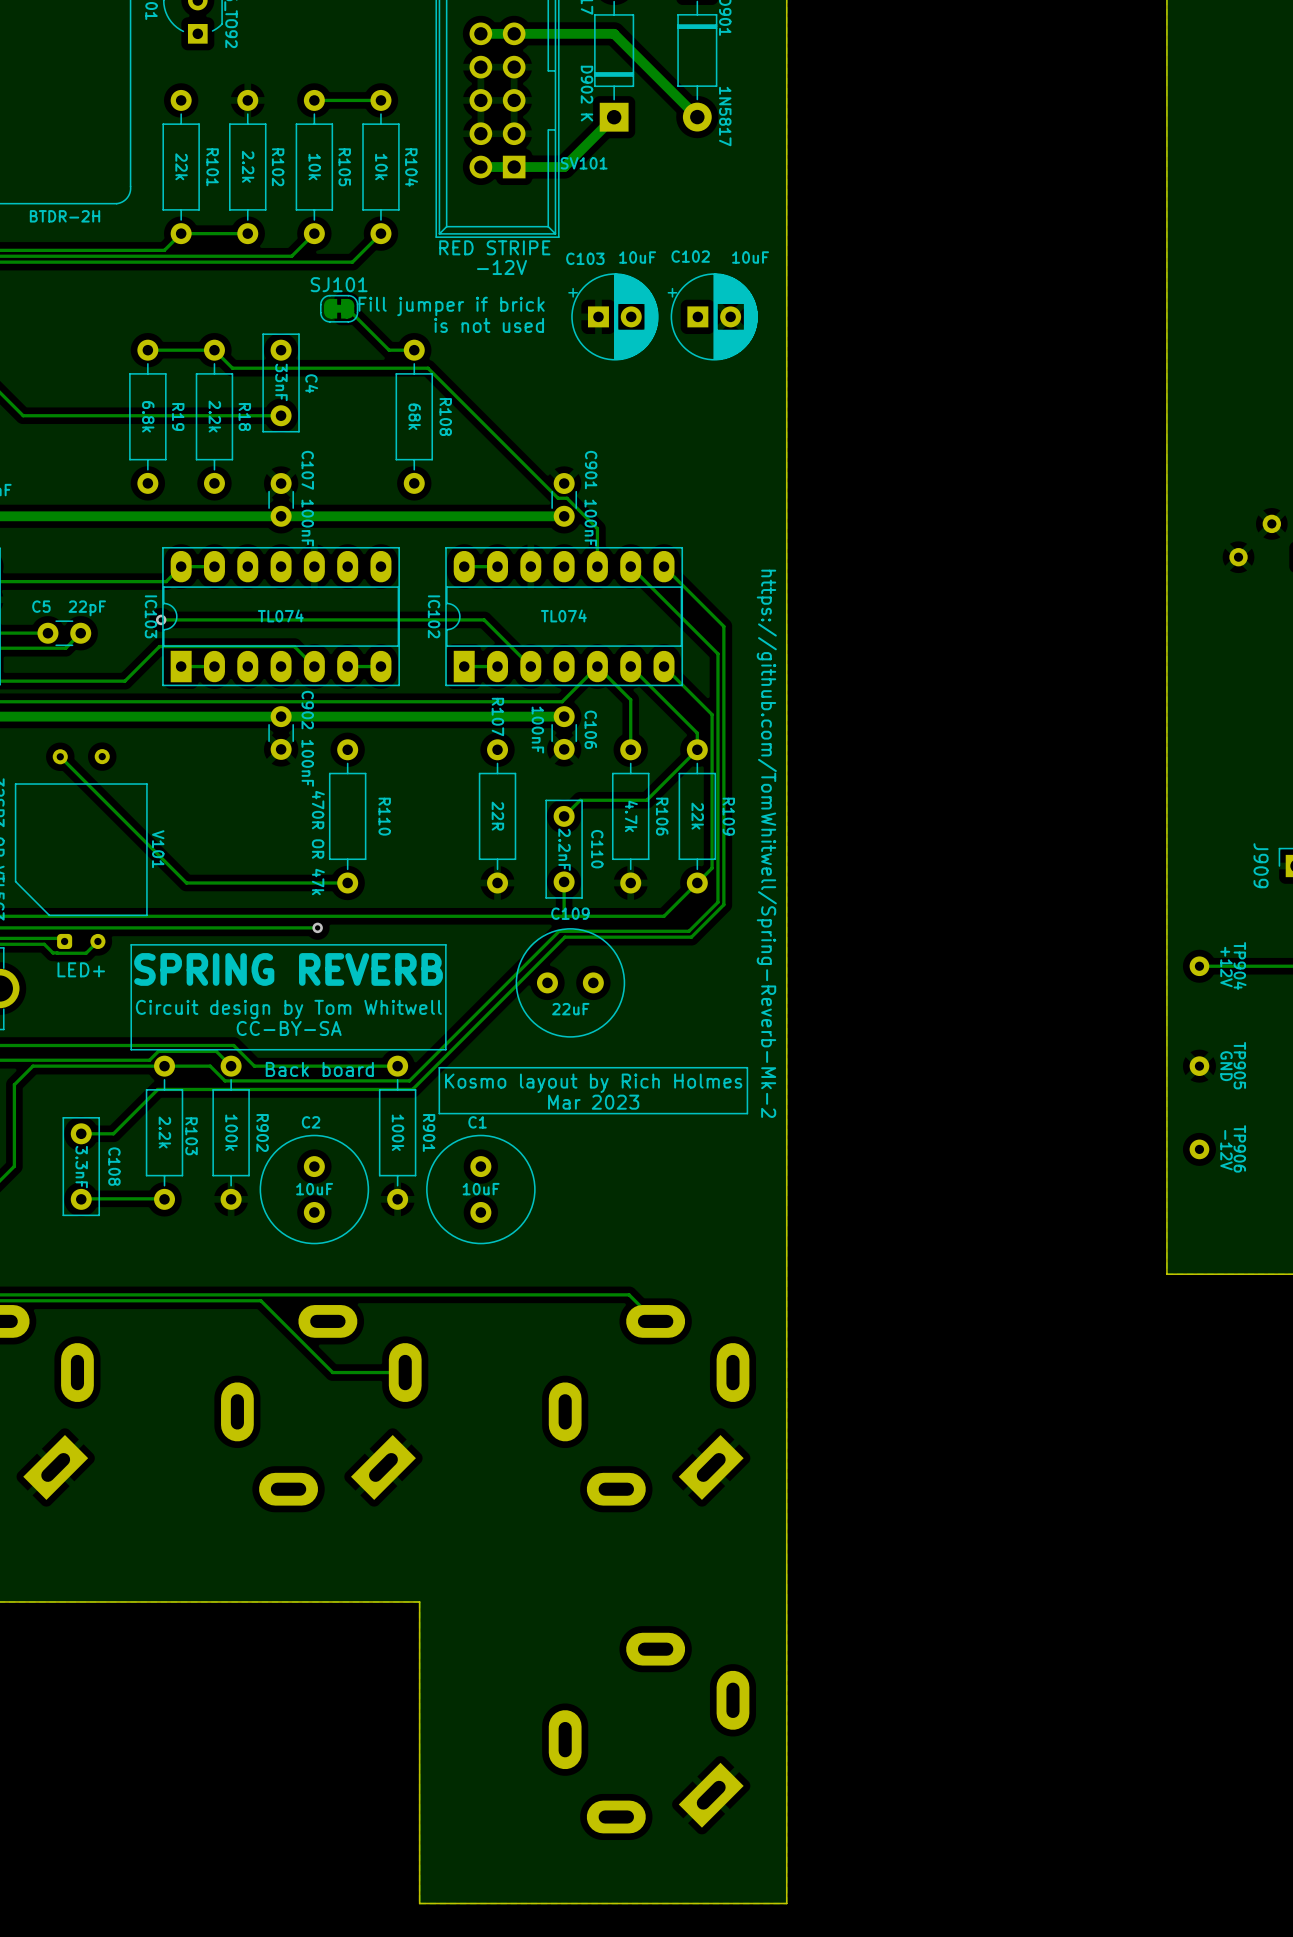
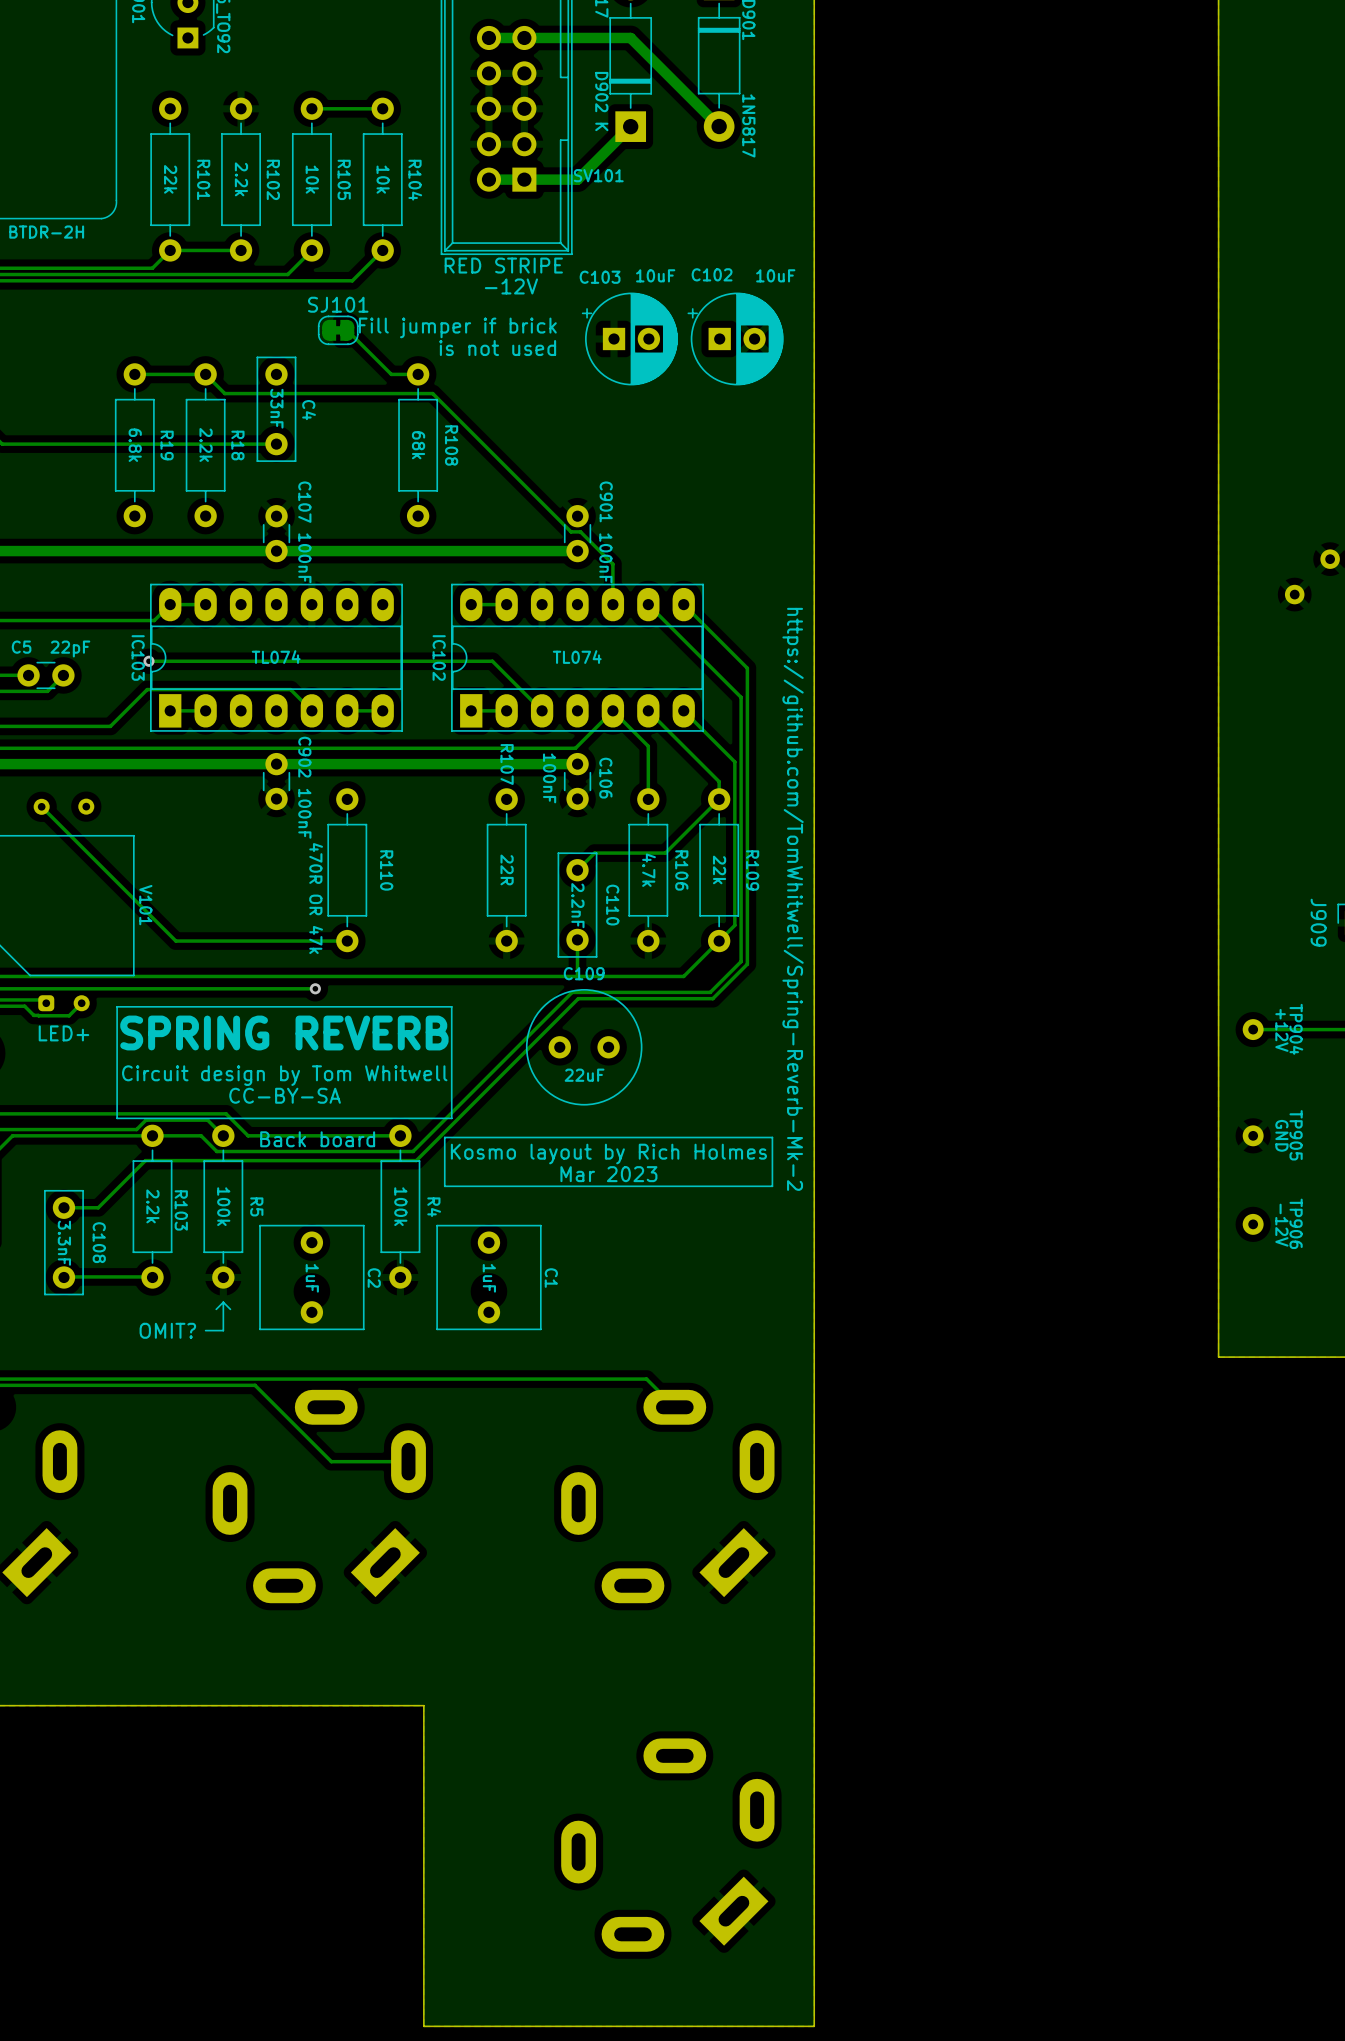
C2 name position: C2 (311, 1122) -> C2 (374, 1278)
C1 name position: C1 (477, 1122) -> C1 (551, 1278)
R902 name: R902 (262, 1133) -> R5 (256, 1206)
R901 name: R901 (429, 1133) -> R4 (434, 1207)
C2 footprint: [259, 1134, 370, 1245] -> [259, 1224, 365, 1331]
C1 footprint: [426, 1134, 536, 1245] -> [436, 1224, 542, 1331]
C2 value: 10uF (314, 1189) -> 1uF (312, 1278)
C1 value: 10uF (481, 1189) -> 1uF (489, 1278)
line: none -> (223, 1302) (216, 1309)
line: none -> (223, 1302) (230, 1309)
line: none -> (223, 1302) (223, 1330) (205, 1330)
text: none -> OMIT? (167, 1330)

